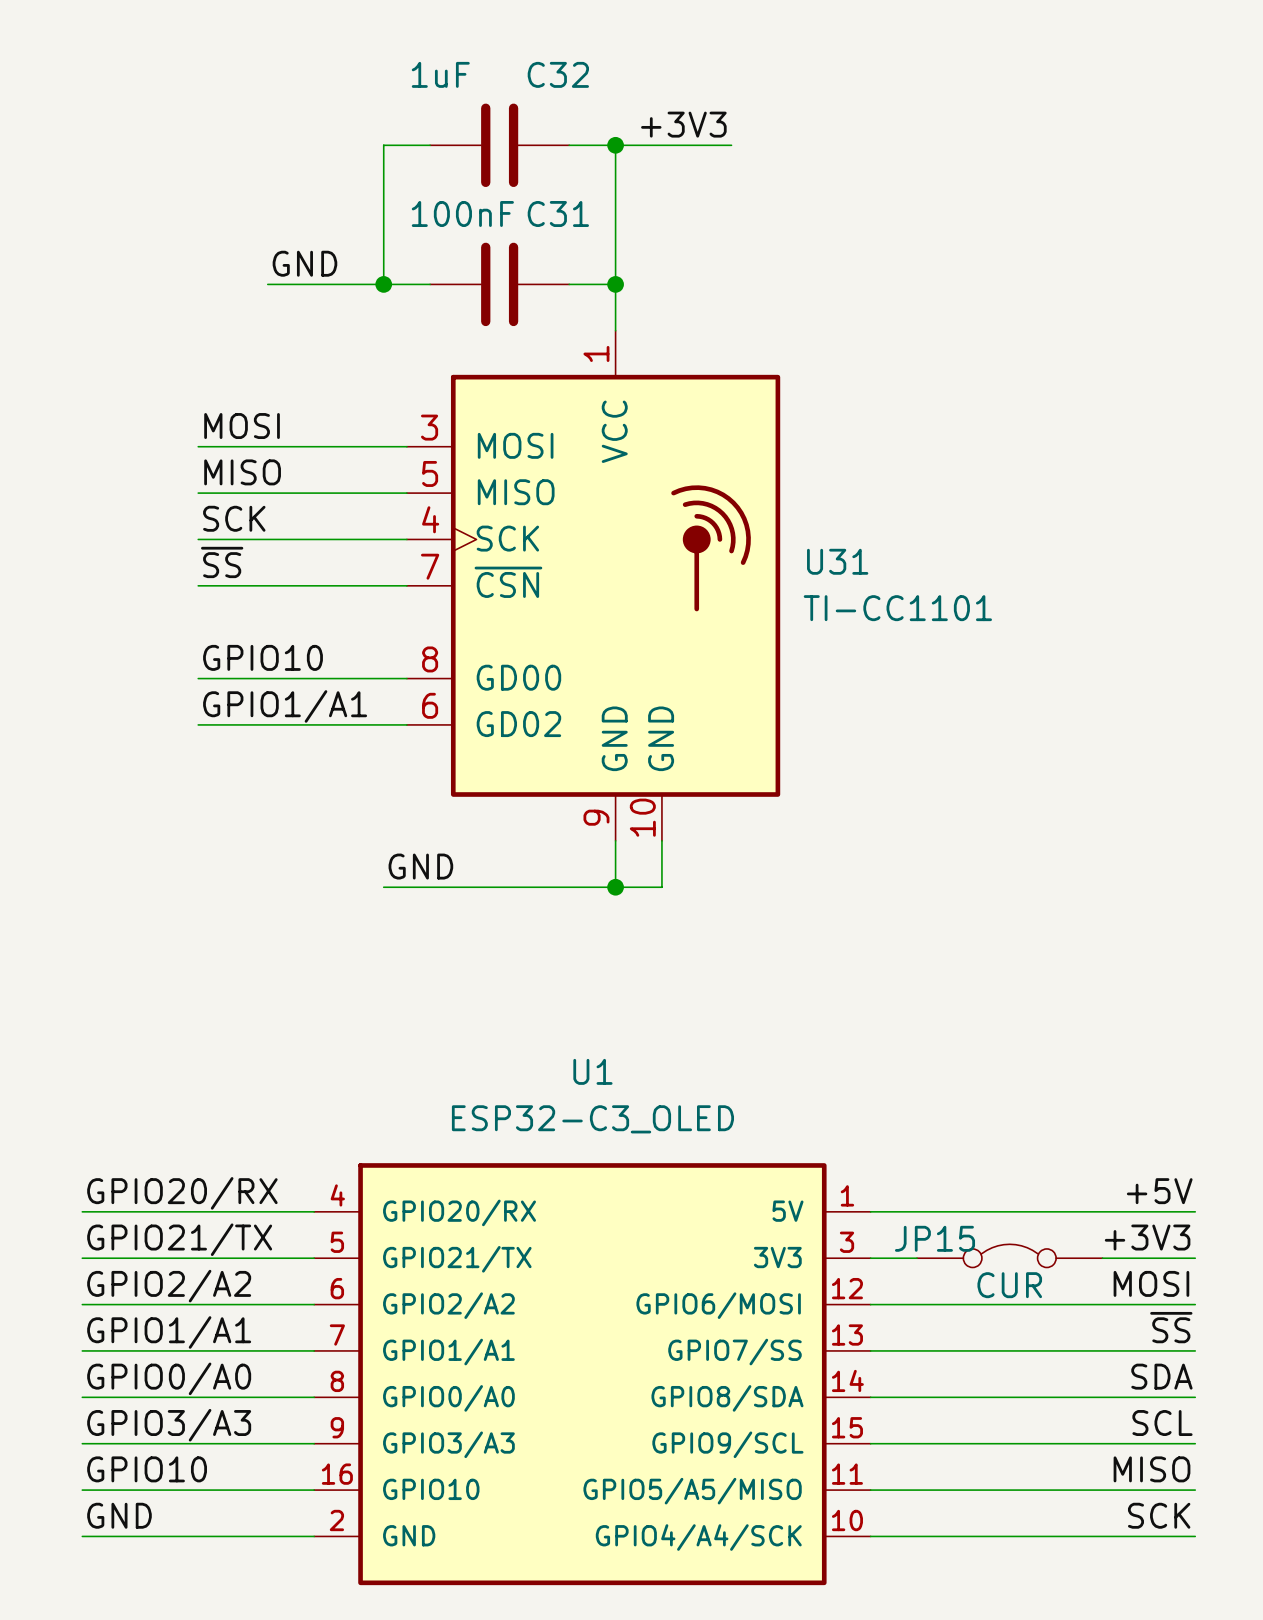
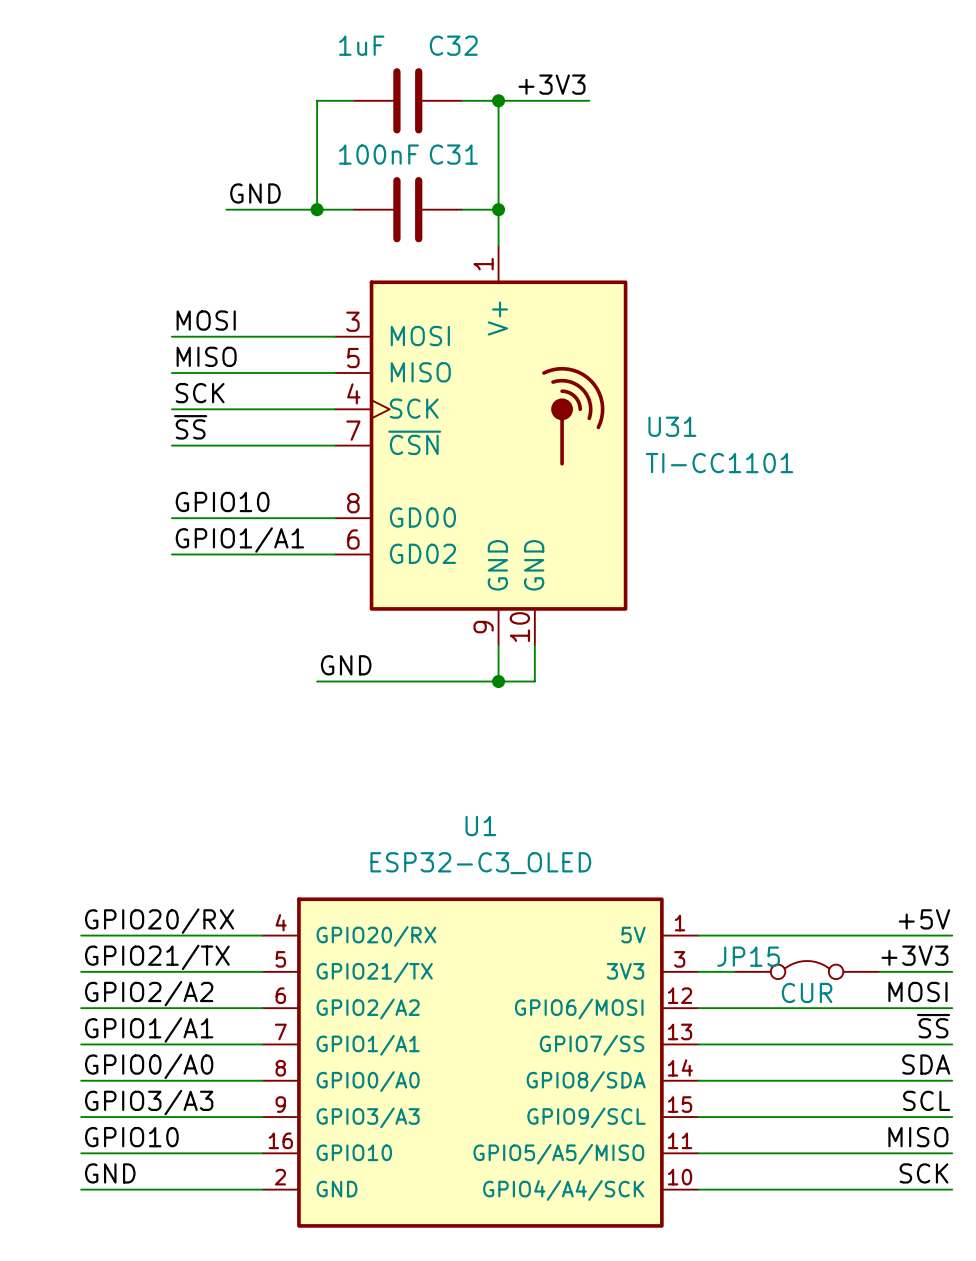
U31 pin name: VCC (614, 431) -> V+ (497, 318)

